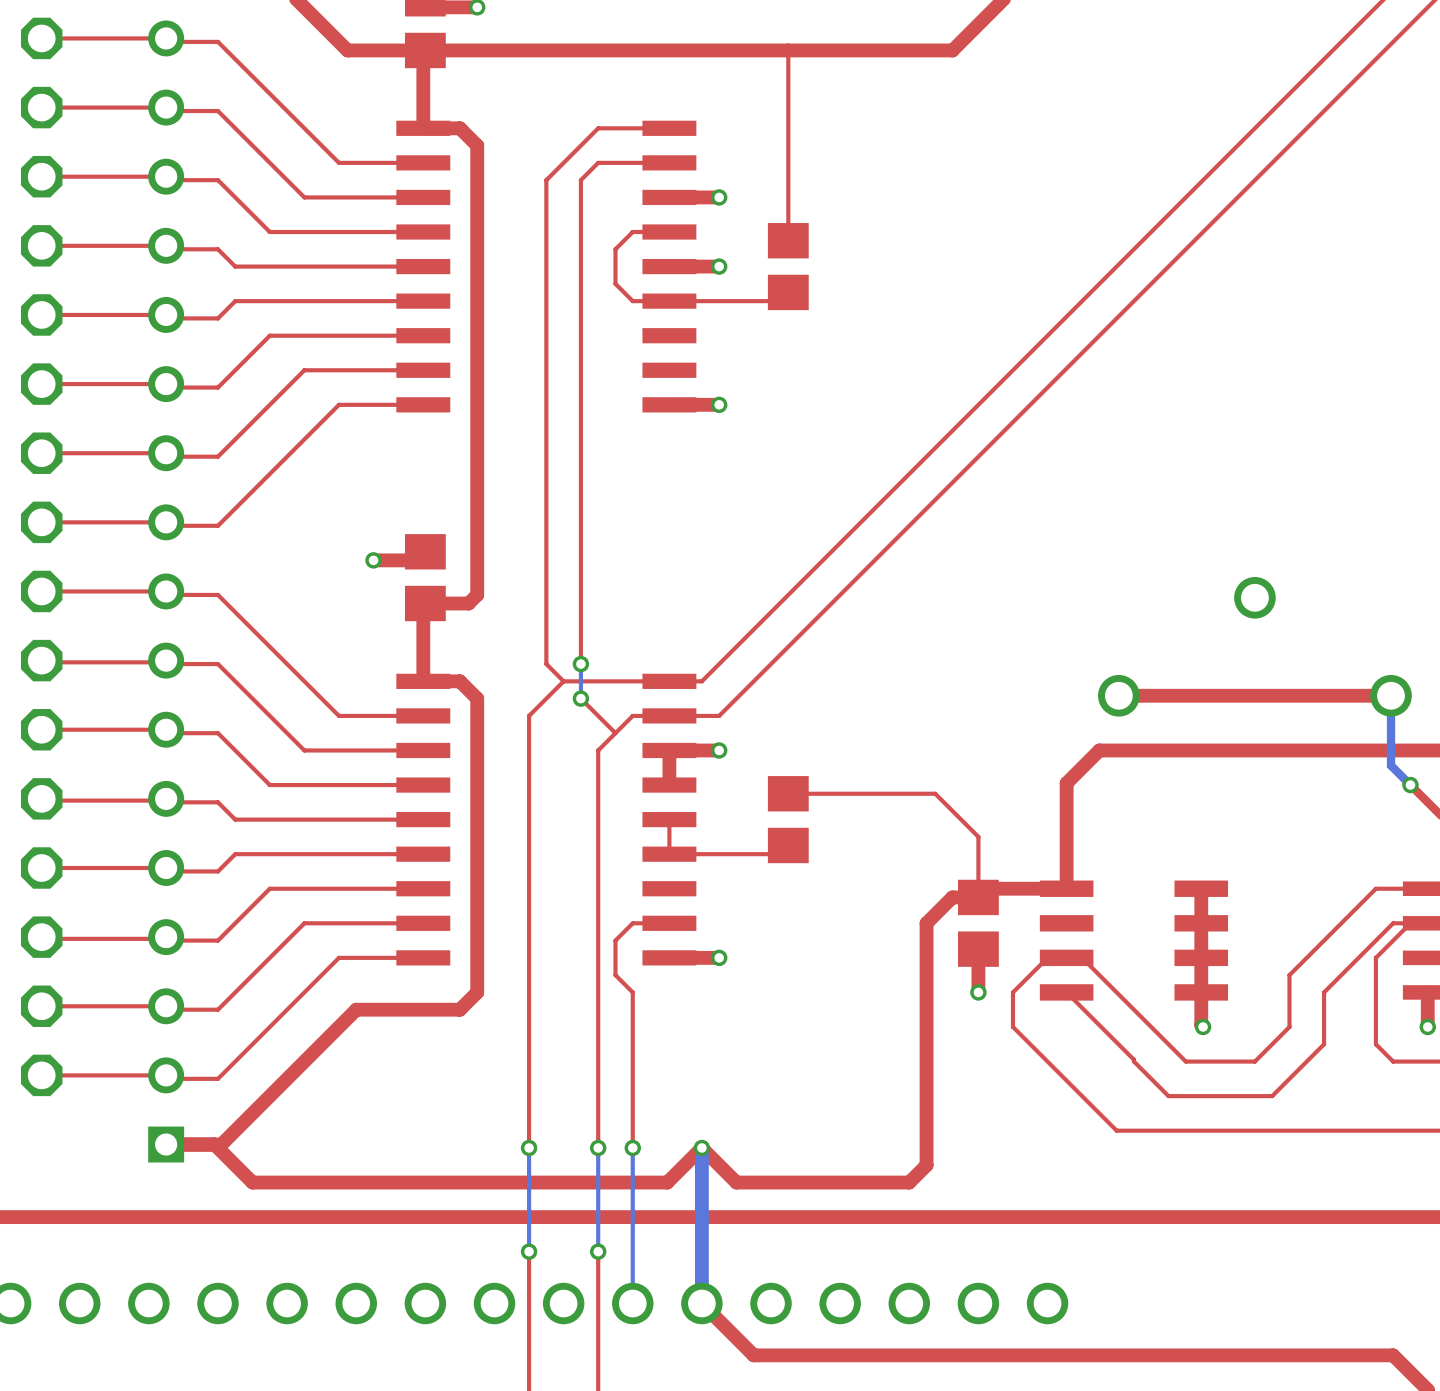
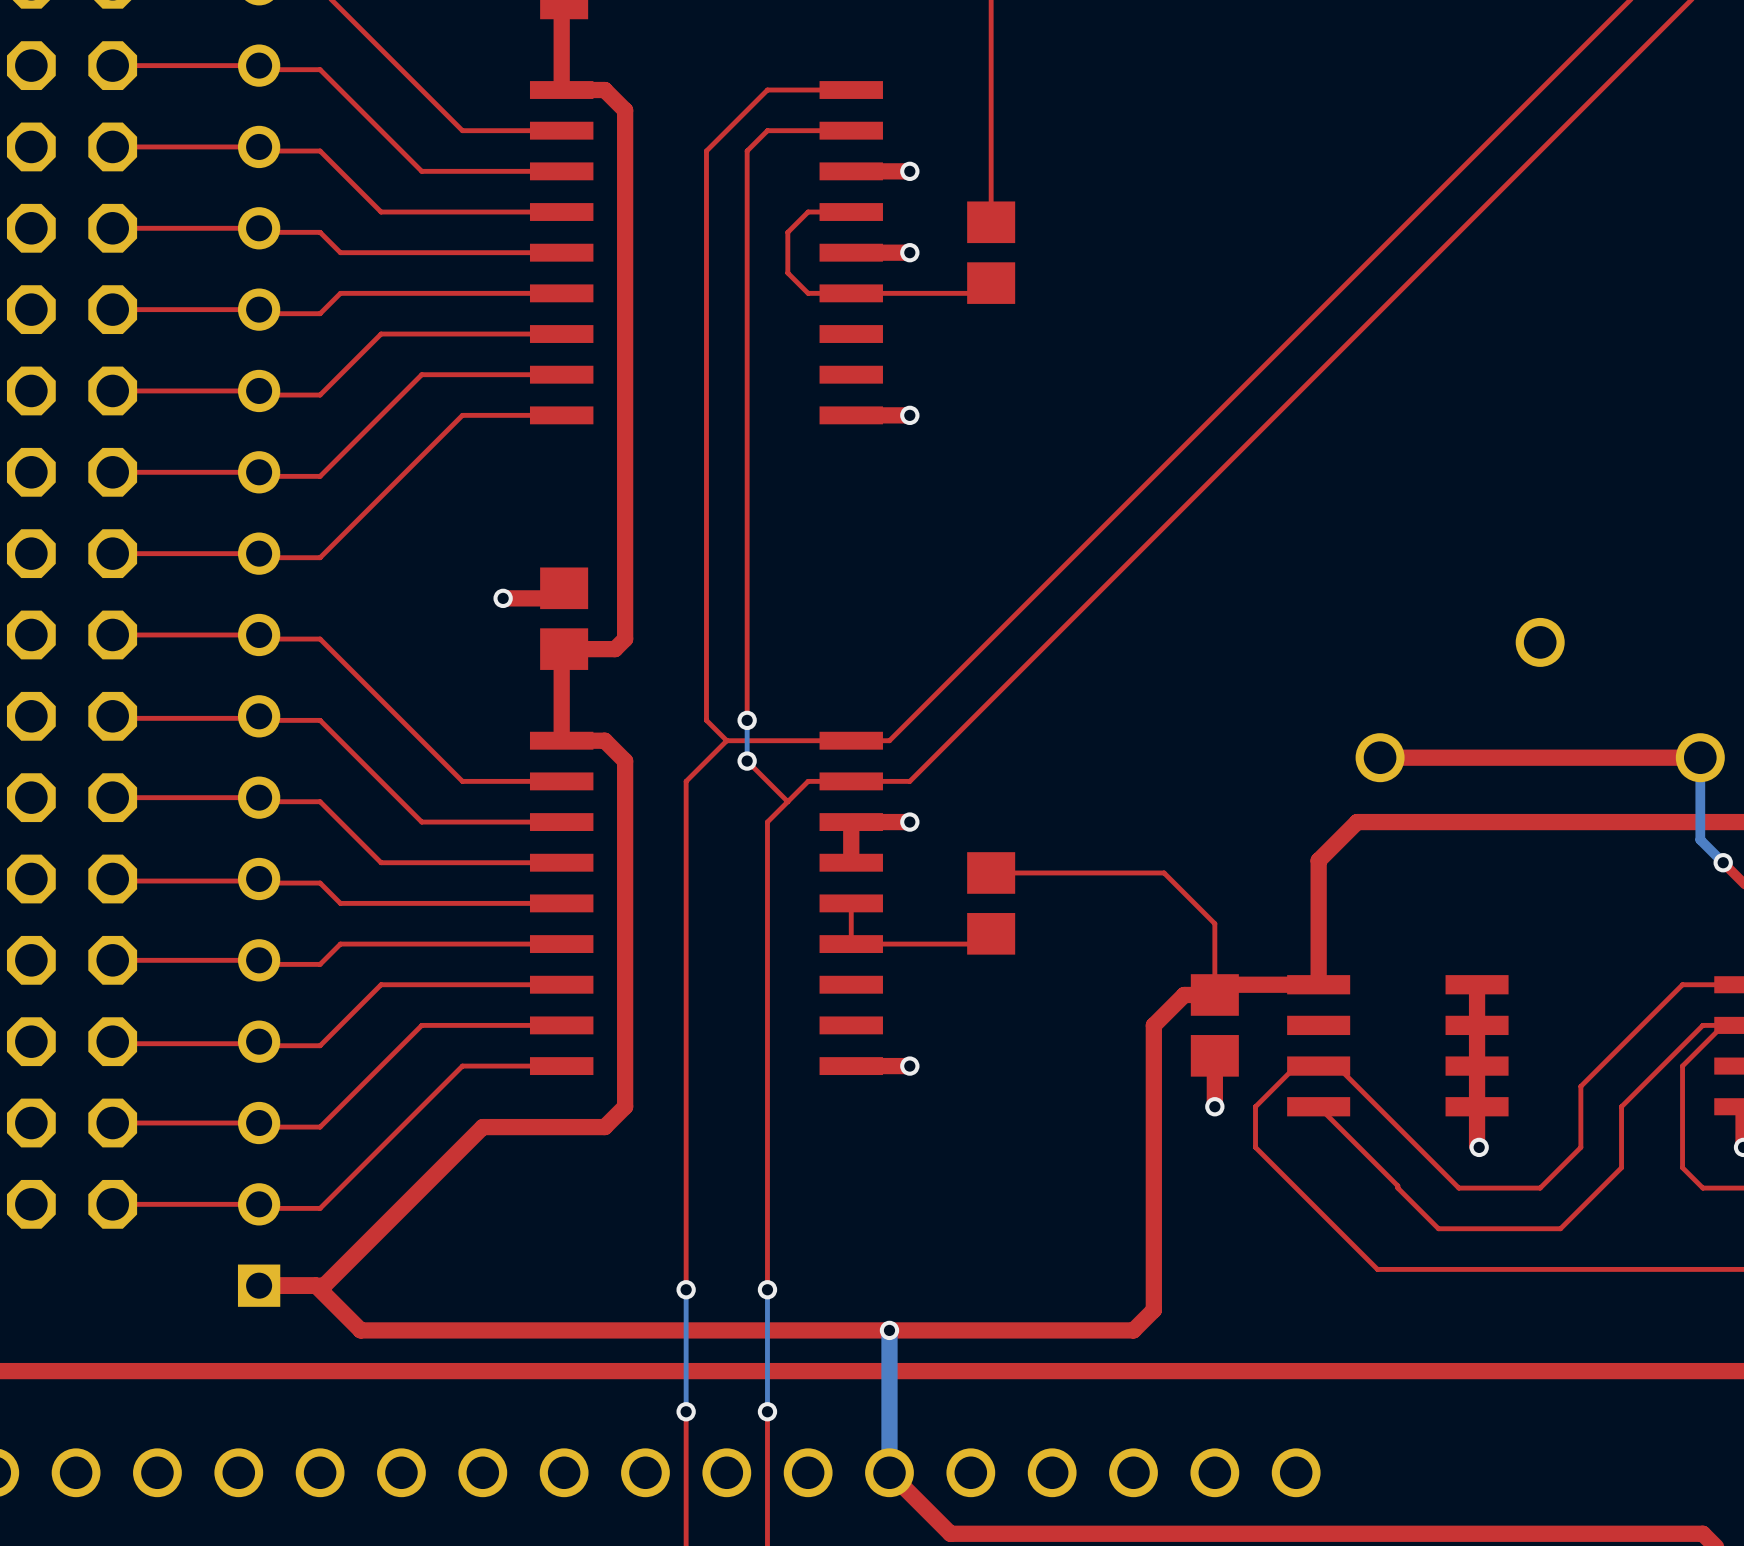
top track: (669, 923) (632, 923) (615, 940) (615, 975) (632, 992) (632, 1147) -> none
bottom track: (632, 1147) (632, 1303) -> none
via: (632, 1147) -> none
bottom track: (701, 1147) (701, 1182) -> none
via position: (701, 1147) -> (889, 1330)
top track: (736, 1182) (701, 1147) (667, 1182) -> (930, 1330) (848, 1330)

